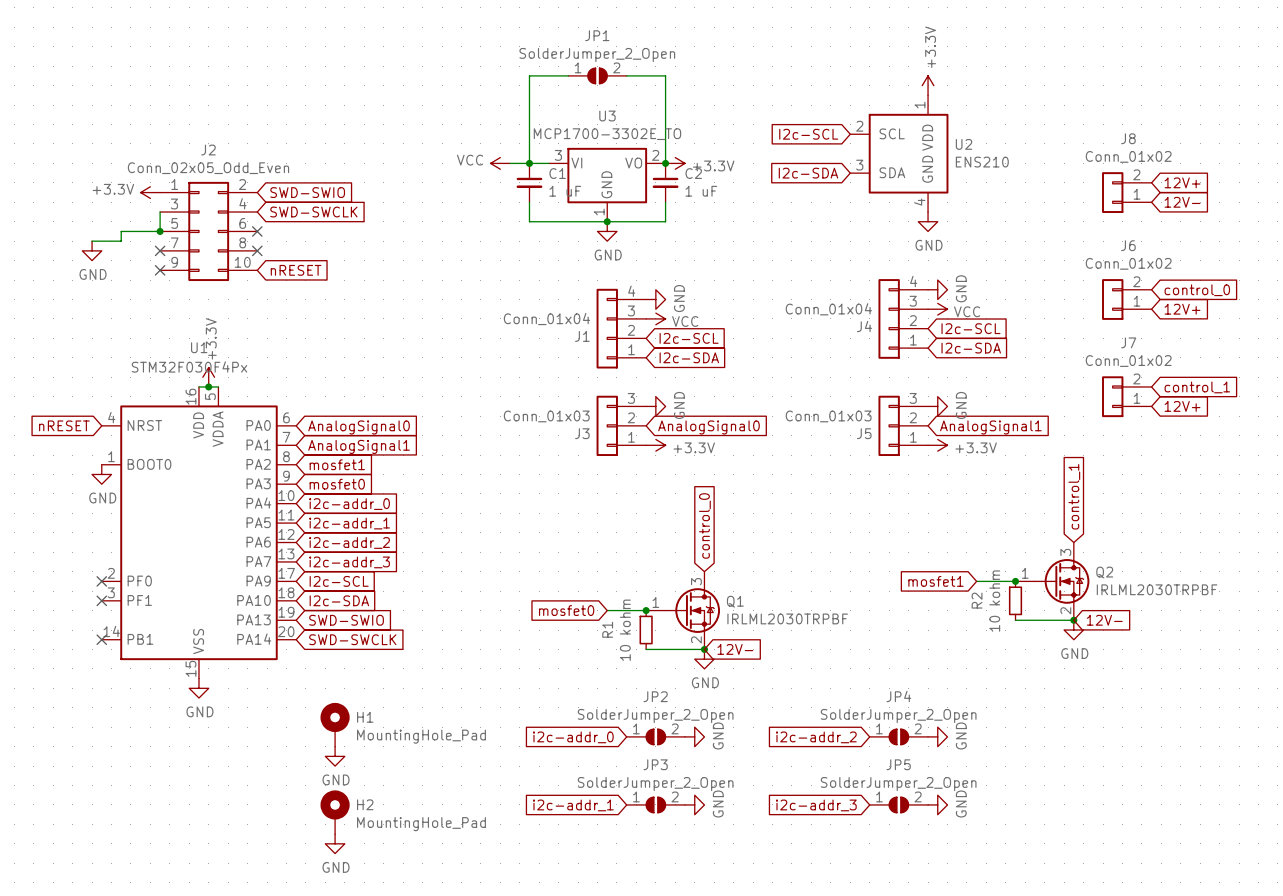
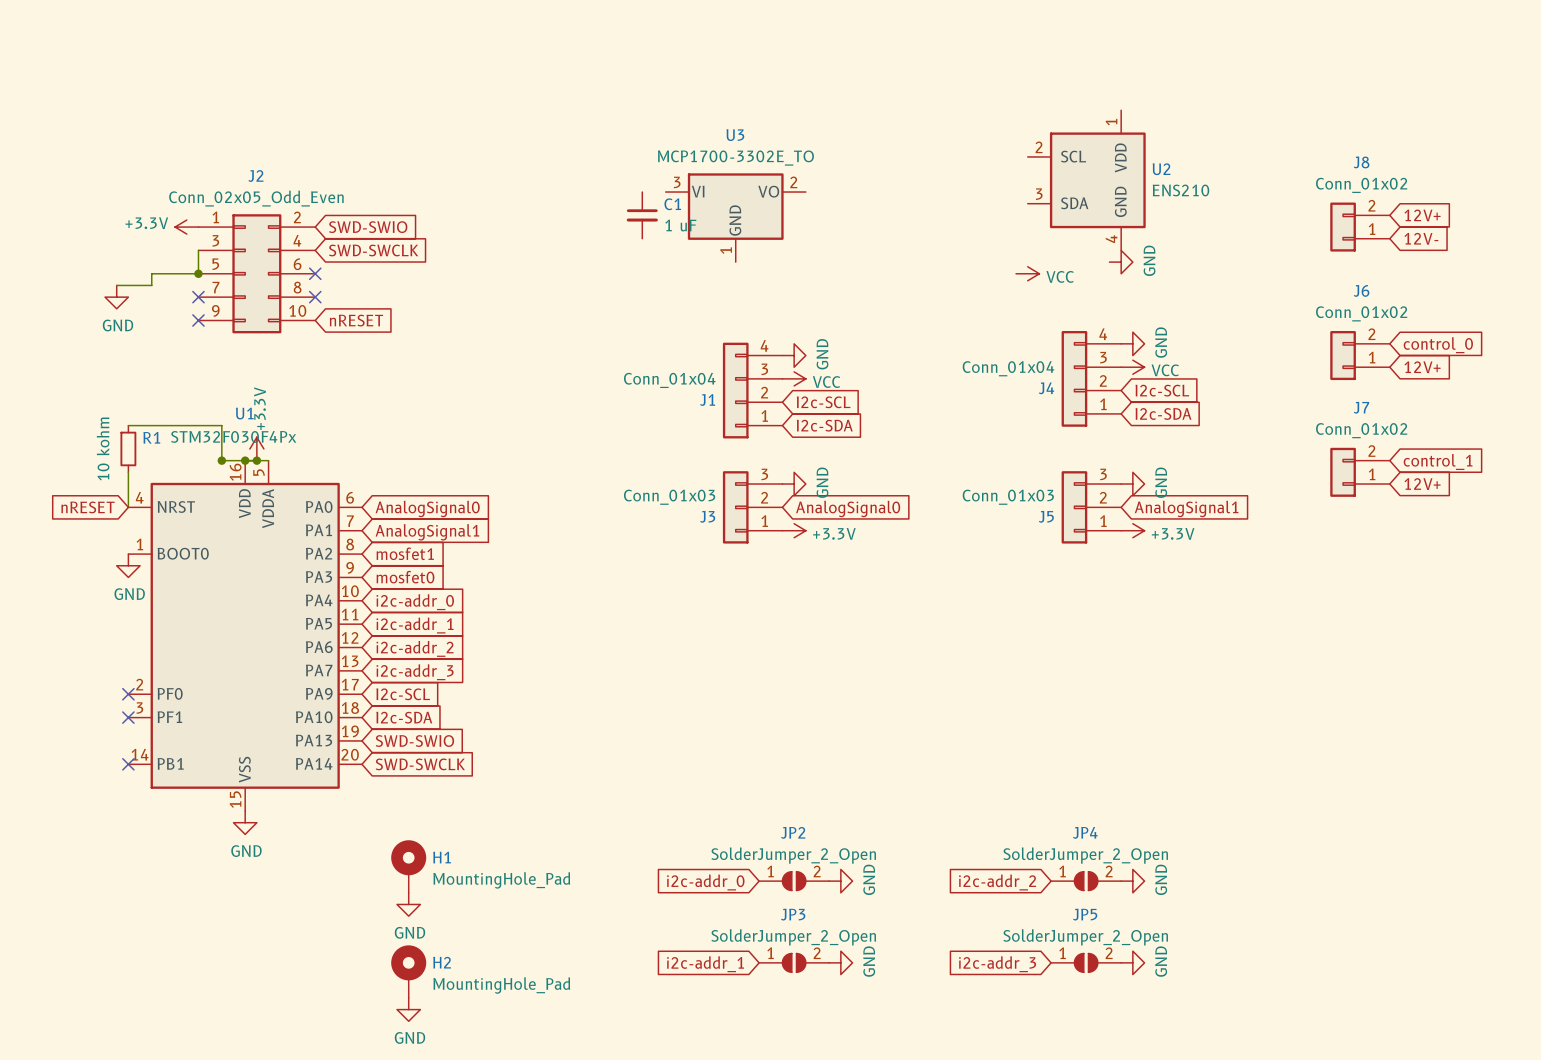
wire: (568, 75) (529, 75) (529, 163) -> none
JP1: SolderJumper_2_Open (597, 75) -> none
wire: (626, 75) (665, 75) (665, 163) -> none
power symbol: +3.3V (928, 85) -> none
global label: I2c-SCL (808, 134) -> none
power symbol: VCC (500, 163) -> none
wire: (510, 163) (548, 163) -> none
junction: (529, 163) -> none
junction: (665, 163) -> none
power symbol: +3.3V (675, 163) -> none
global label: I2c-SDA (808, 173) -> none
C2: 1 uF (665, 182) -> none
wire: (529, 202) (529, 221) (665, 221) (665, 202) -> none
junction: (607, 221) -> none
power symbol rotation: 0° (928, 221) -> 90° counterclockwise (1121, 262)
power symbol: GND (607, 231) -> none
power symbol: none -> VCC (1027, 273)
wire: none -> (128, 425) (221, 425) (221, 460) (245, 460)
junction: none -> (221, 460)
junction: none -> (245, 460)
wire: none -> (128, 472) (128, 507)
global label: control_1 (1074, 496) -> none
global label: control_0 (704, 525) -> none
global label: mosfet1 (936, 581) -> none
wire: (976, 581) (1015, 581) -> none
junction: (1015, 581) -> none
Q2: IRLML2030TRPBF (1052, 581) -> none
R2: 10 kohm (1015, 600) -> none
global label: mosfet0 (566, 610) -> none
wire: (607, 610) (646, 610) -> none
junction: (646, 610) -> none
Q1: IRLML2030TRPBF (683, 610) -> none
wire: (1015, 620) (1073, 620) -> none
junction: (1073, 620) -> none
global label: 12V- (1104, 620) -> none
R1 name rotation: 0° (607, 629) -> 90° clockwise (151, 437)
R1 name position: R1 (607, 629) -> R1 (151, 437)
R1 position: (646, 630) -> (128, 448)
power symbol: GND (1073, 630) -> none
wire: (646, 649) (704, 649) -> none
junction: (704, 649) -> none
global label: 12V- (735, 649) -> none
power symbol: GND (704, 659) -> none

